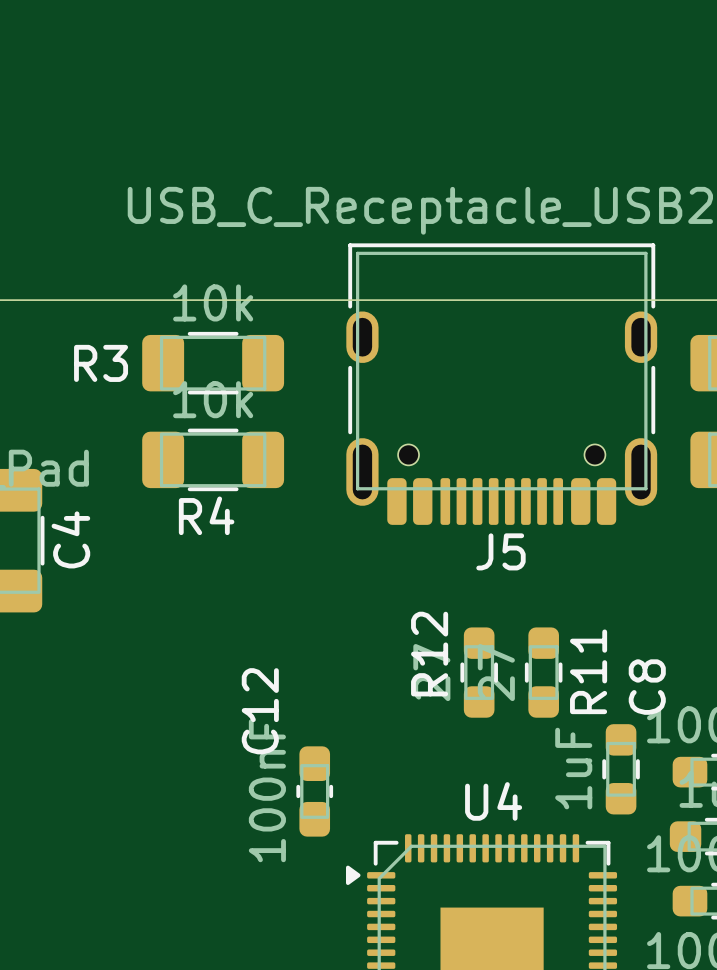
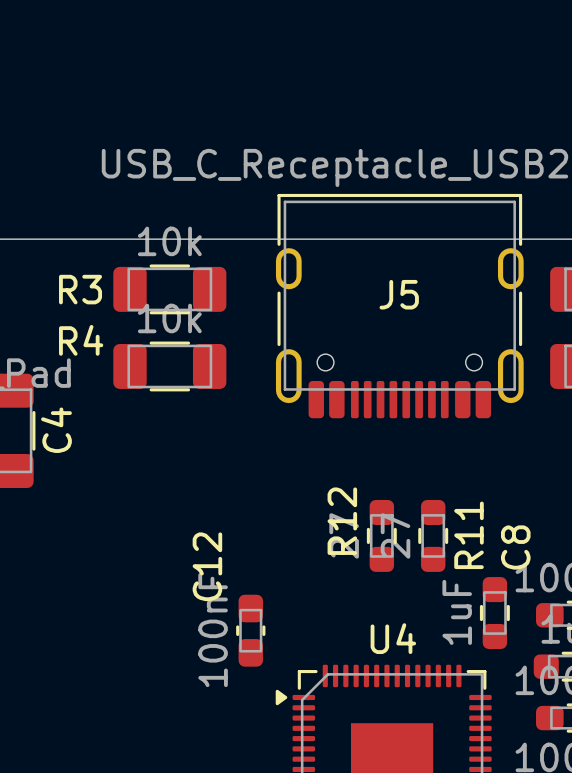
R4 name position: R4 (206, 515) -> R4 (81, 340)
J5 name position: J5 (500, 551) -> J5 (399, 294)

